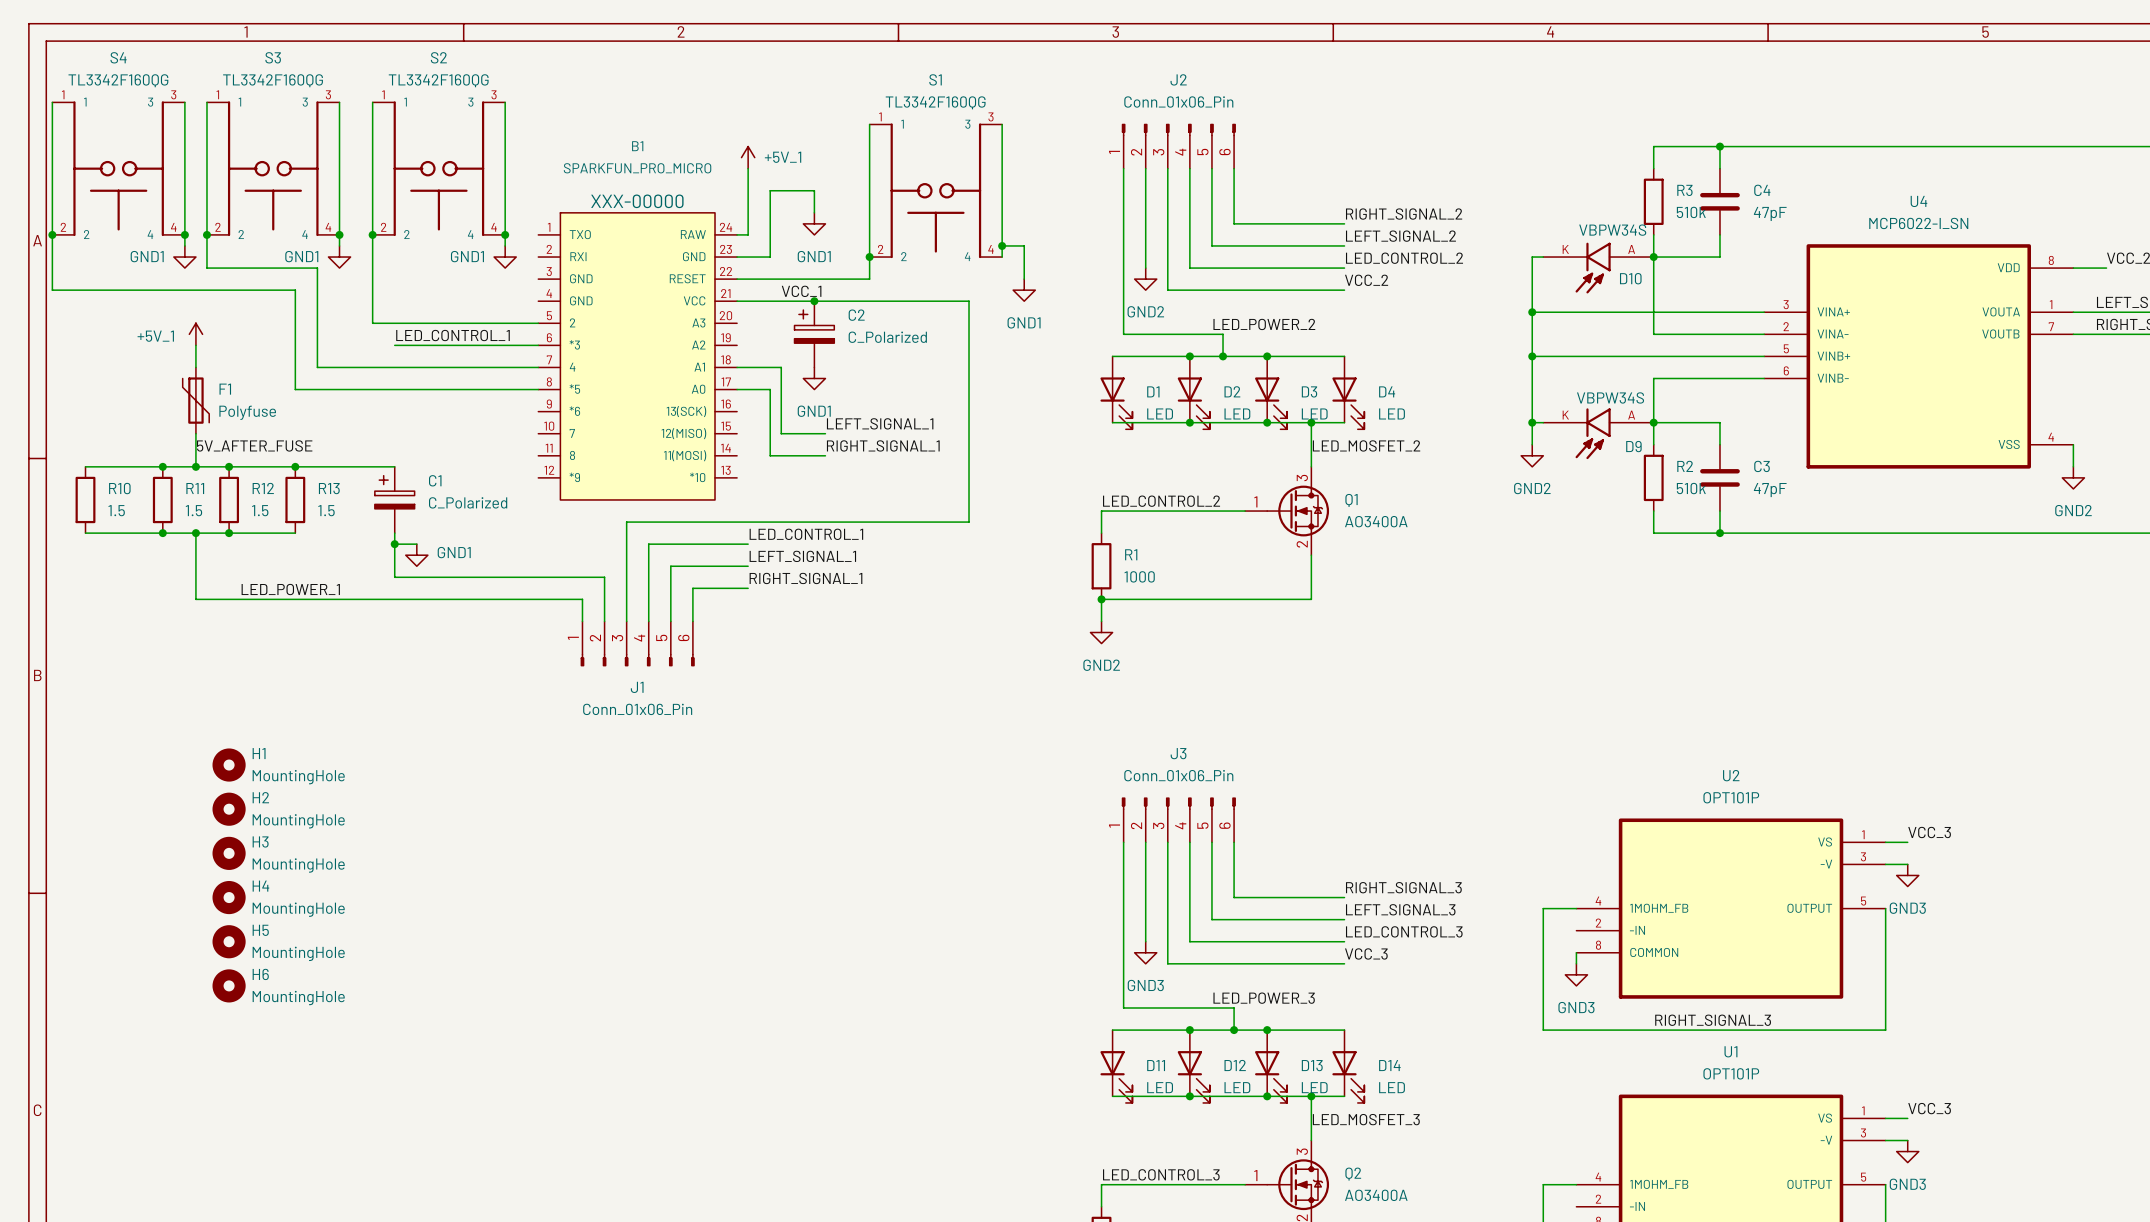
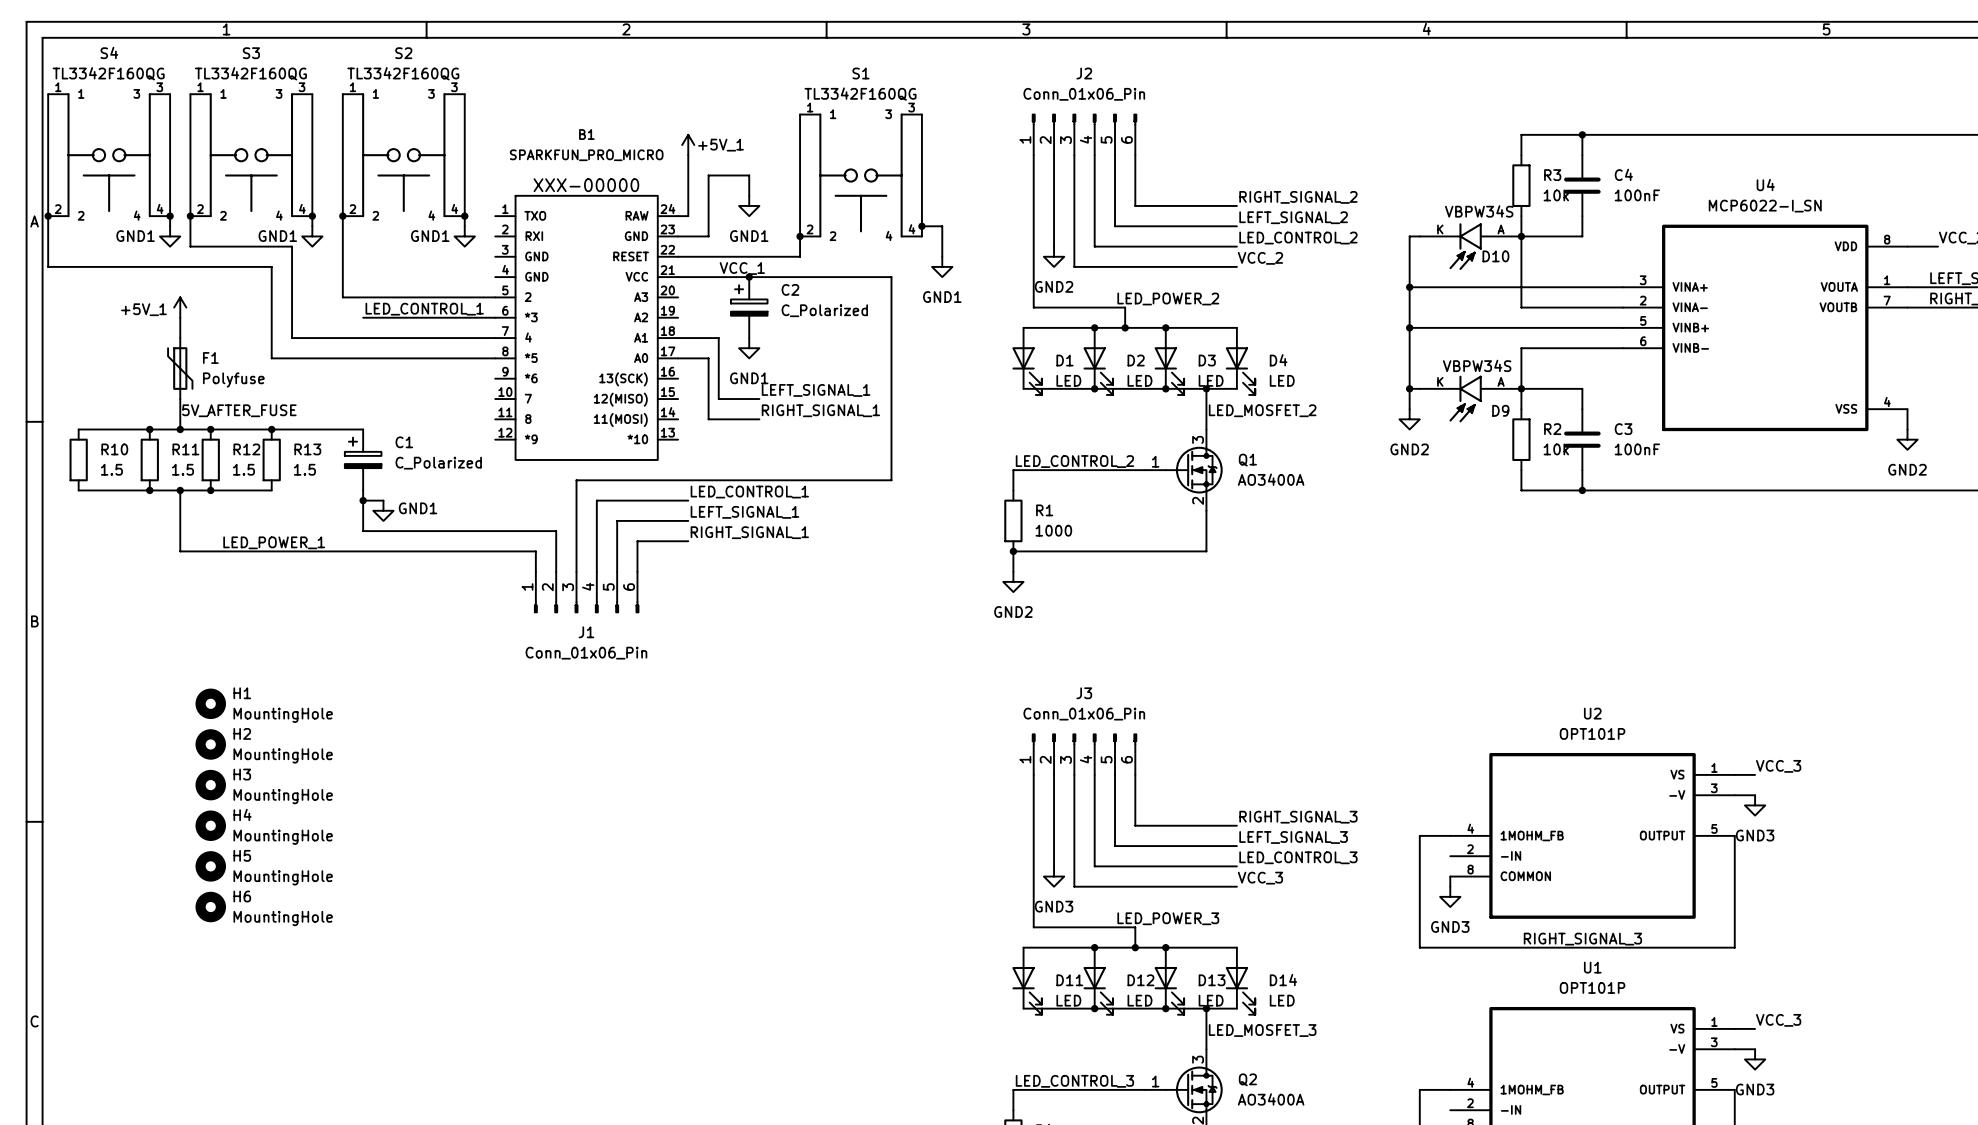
R3 value: 510k (1691, 212) -> 10k (1556, 195)
C4 value: 47pF (1770, 213) -> 100nF (1637, 195)
R2 value: 510k (1691, 488) -> 10k (1556, 449)
C3 value: 47pF (1770, 490) -> 100nF (1637, 449)

